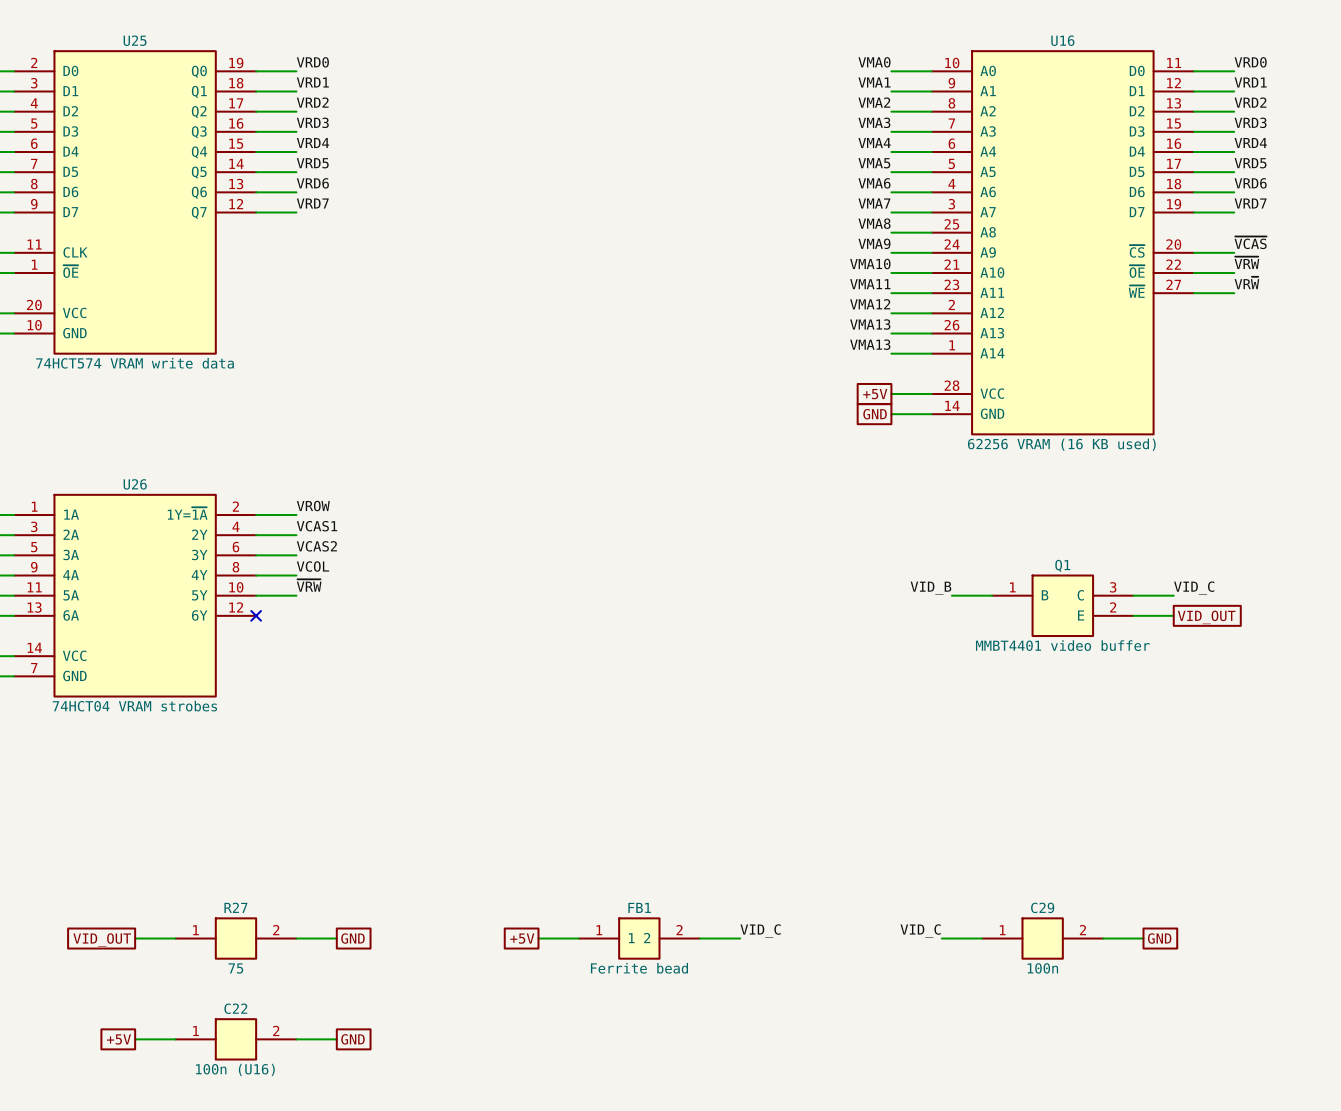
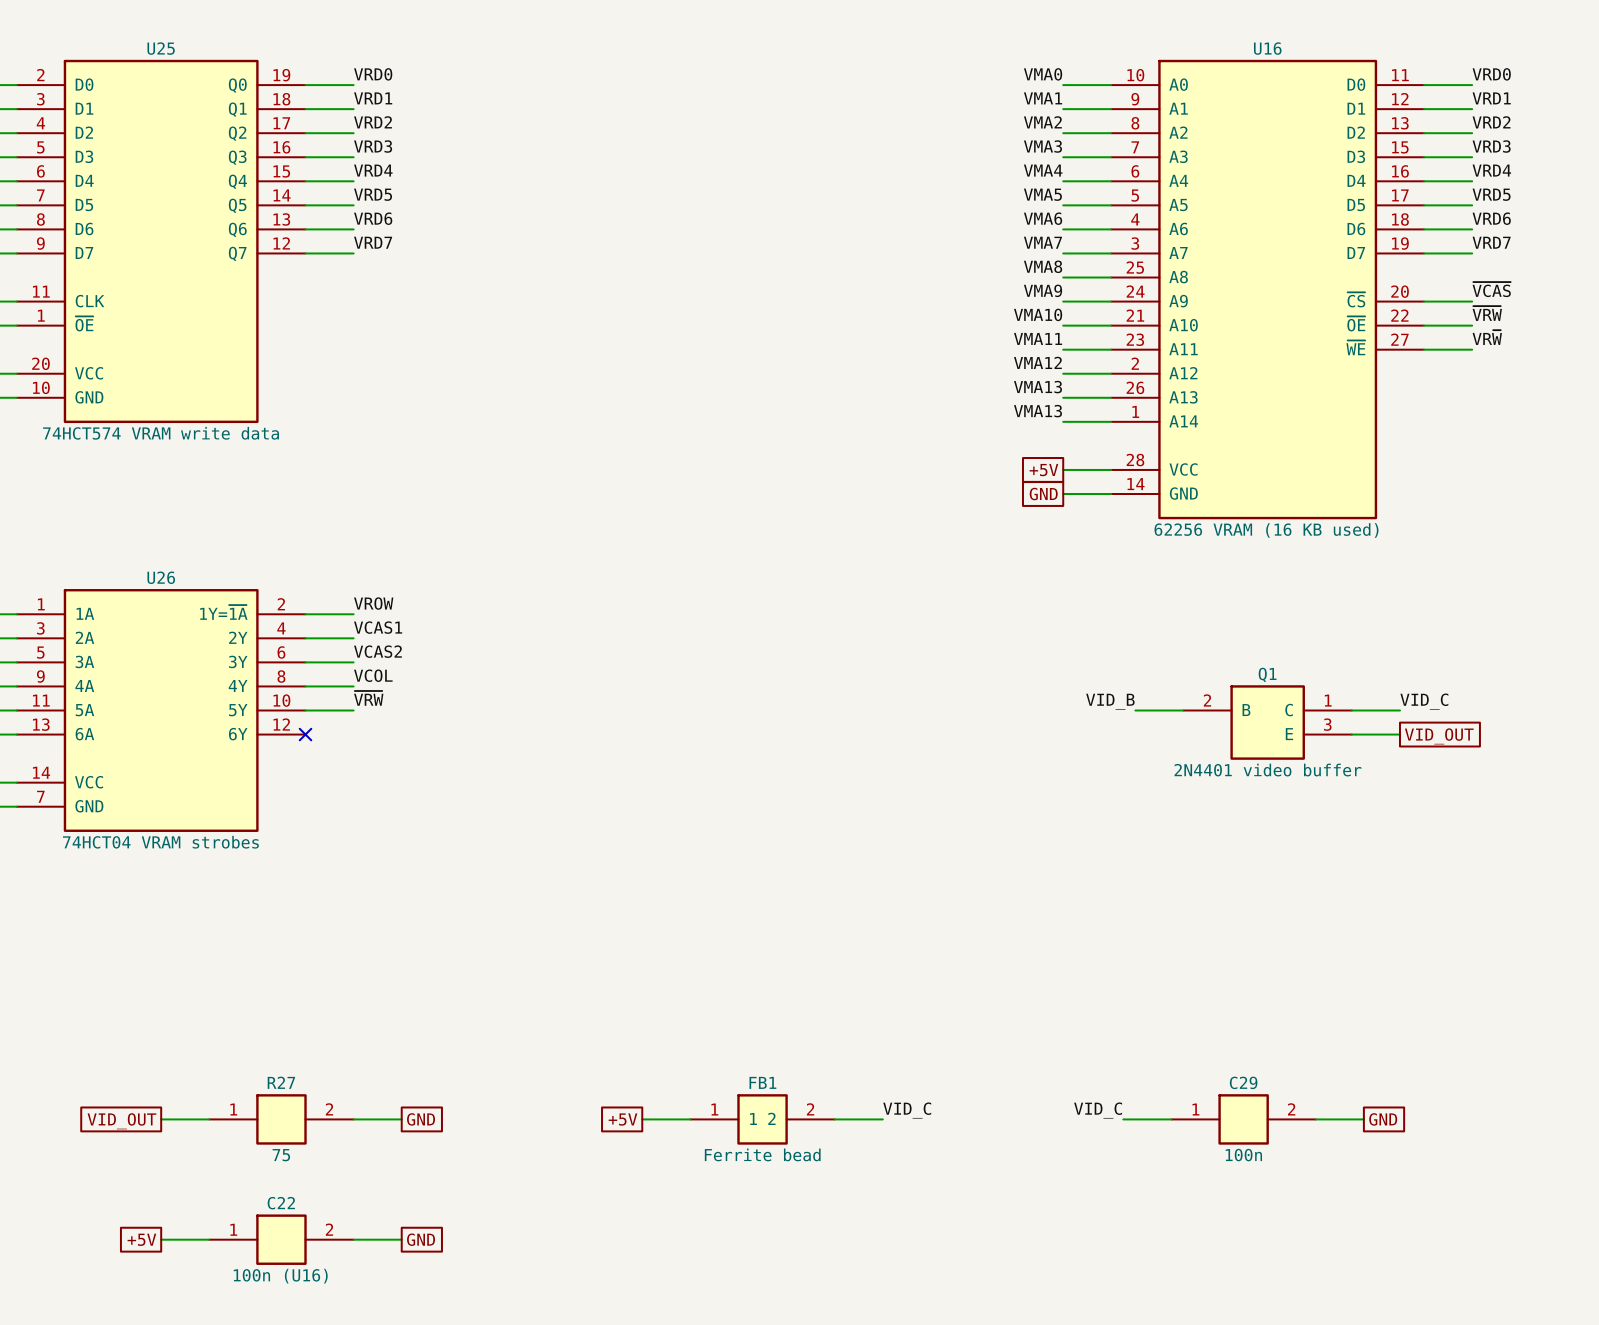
Q1 pin number: 1 (1012, 587) -> 2 (1207, 700)
Q1 pin number: 3 (1113, 587) -> 1 (1328, 700)
Q1 pin number: 2 (1113, 607) -> 3 (1327, 724)
Q1 value: MMBT4401 video buffer (1062, 645) -> 2N4401 video buffer (1267, 770)

